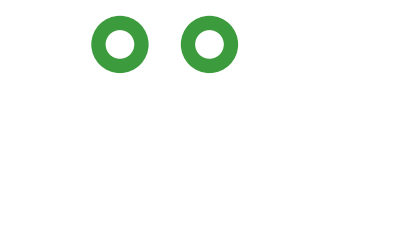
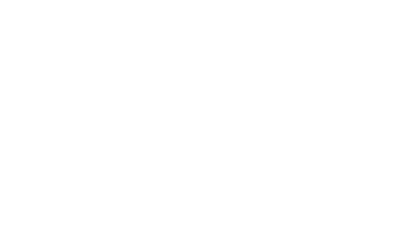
part: (164, 44) -> none

